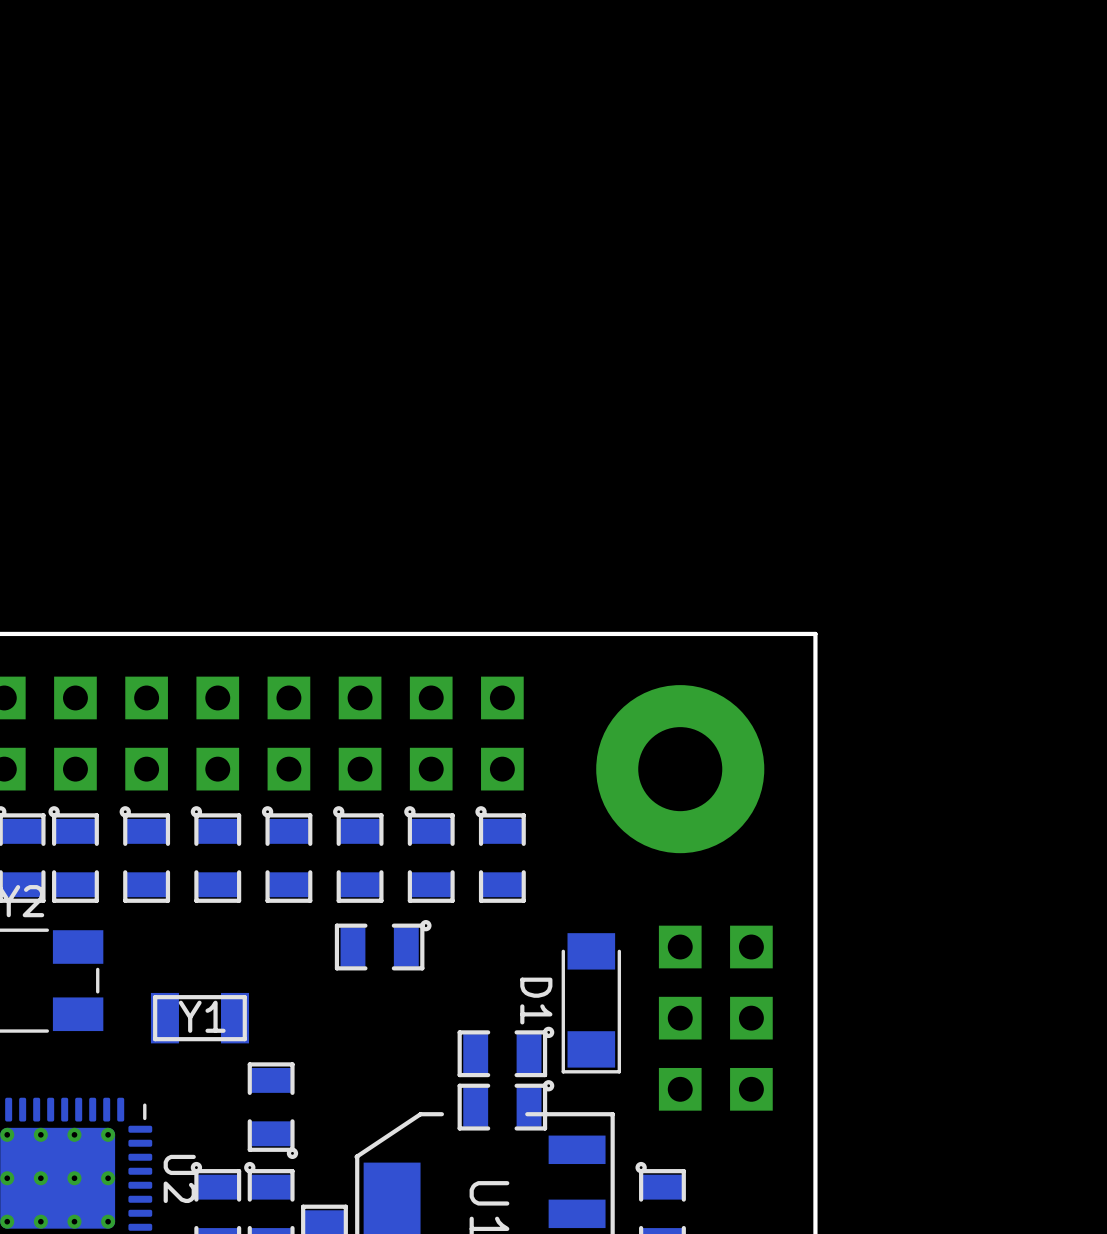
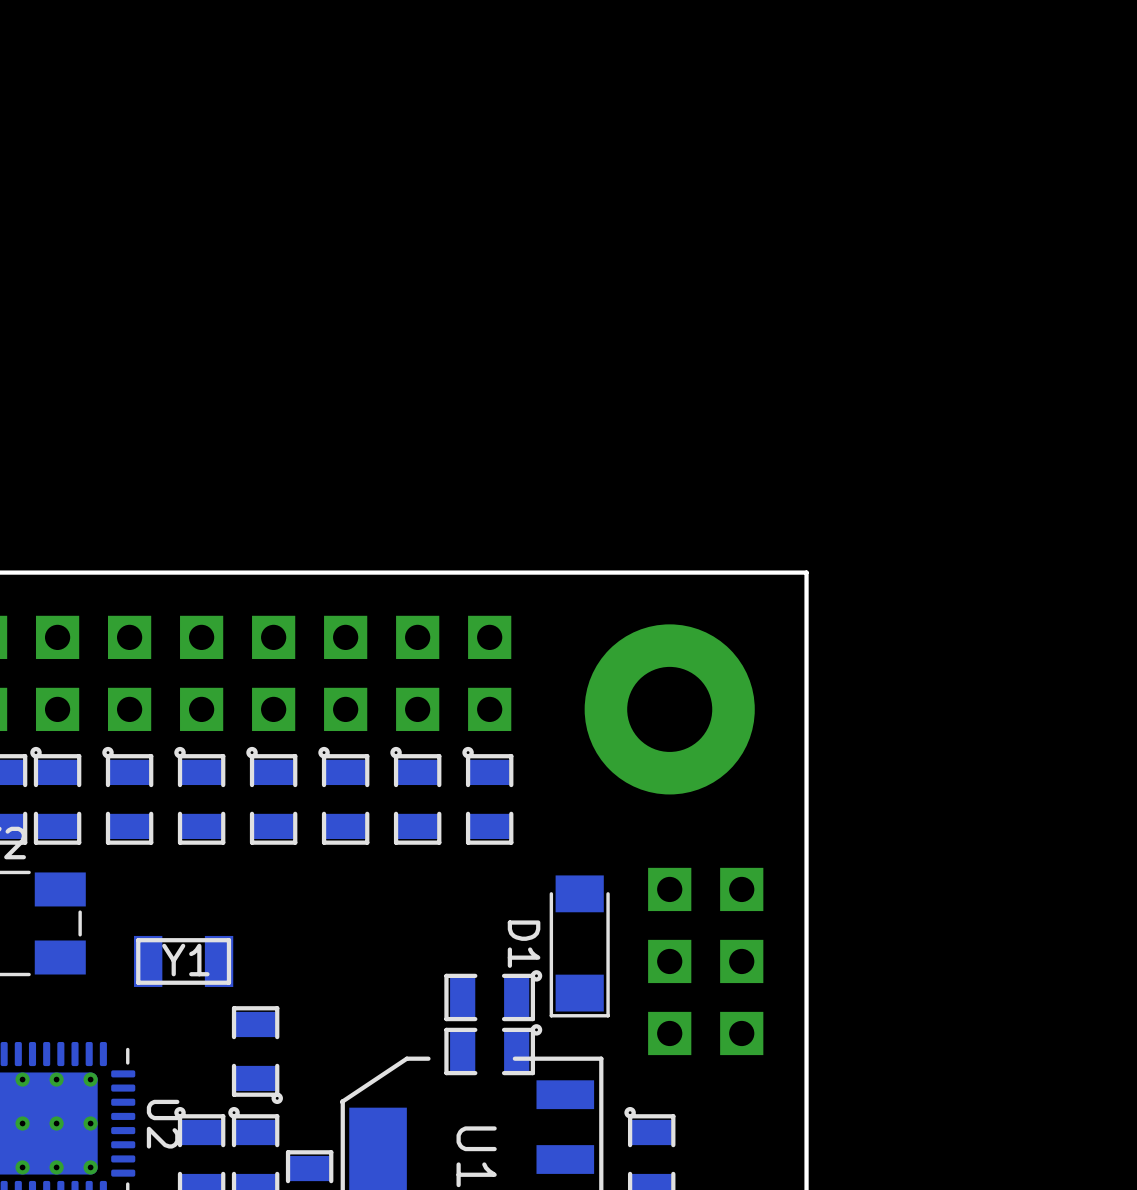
part: (383, 945) -> none

